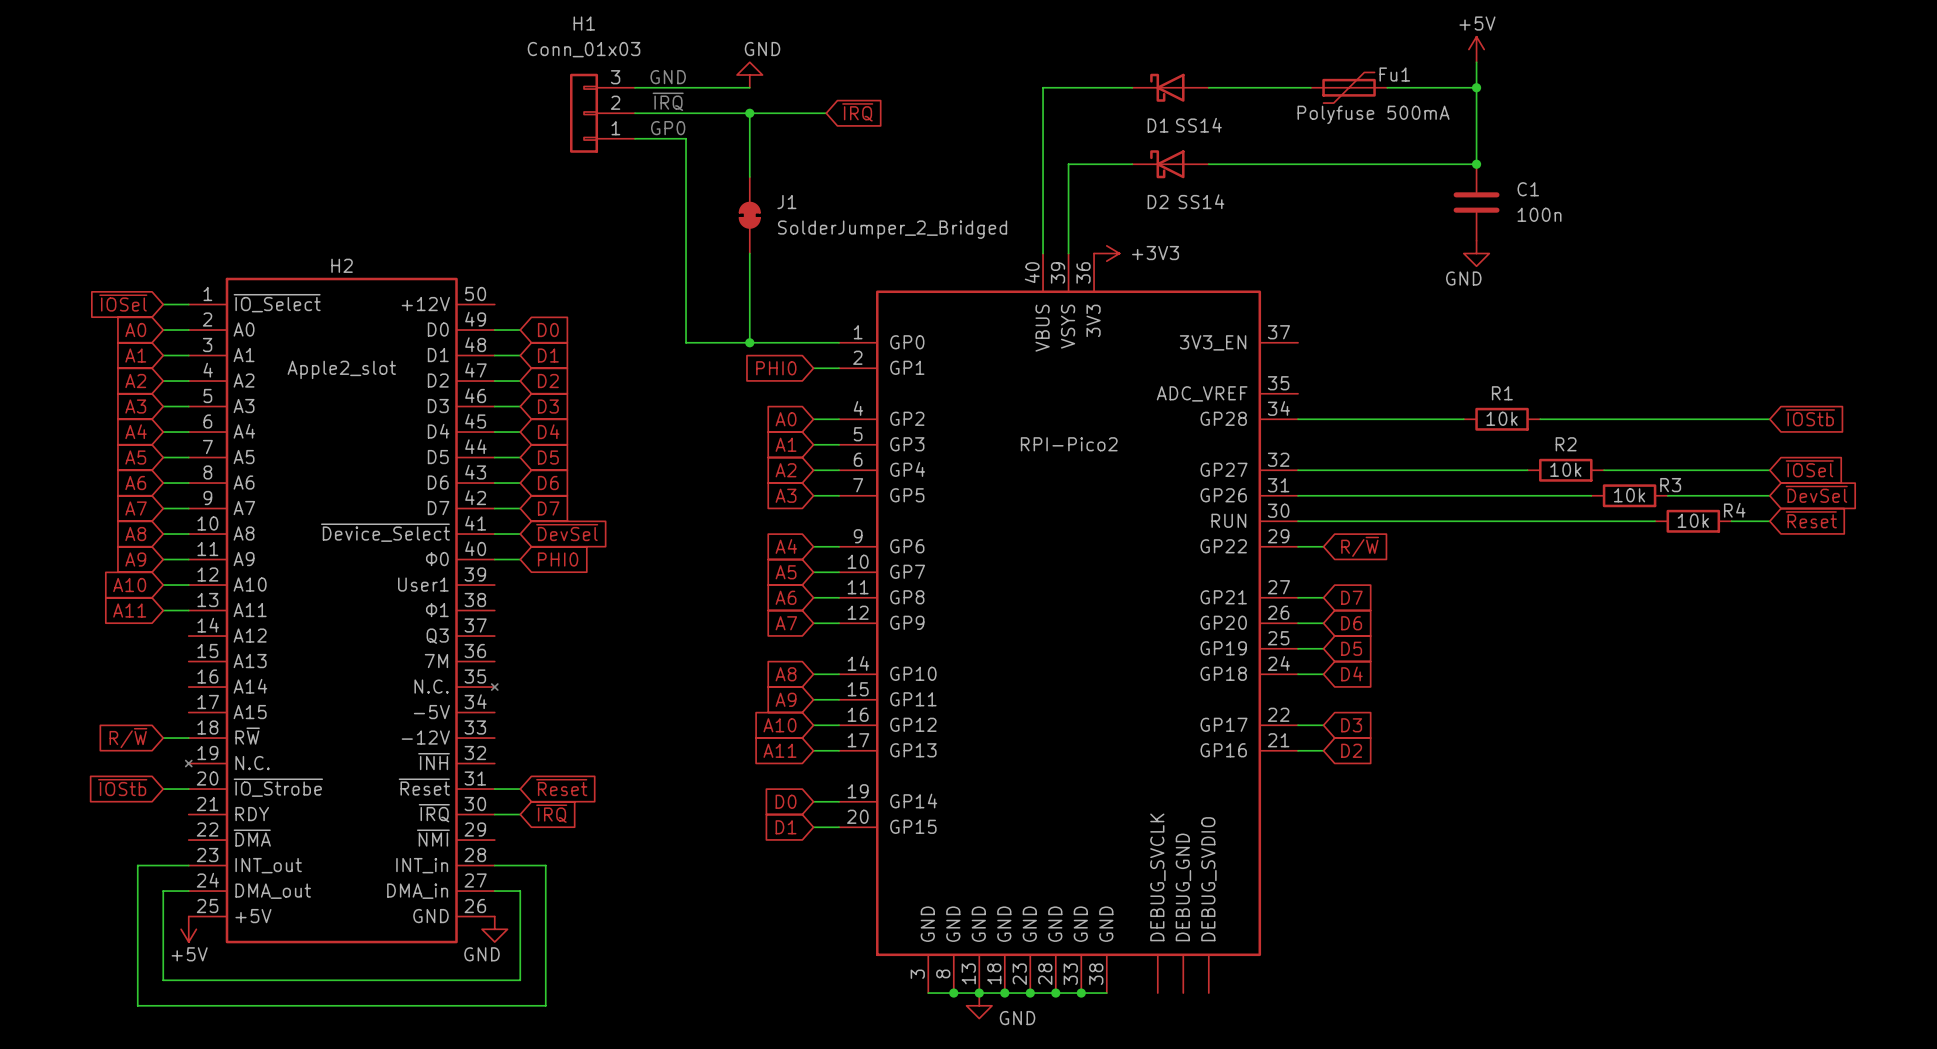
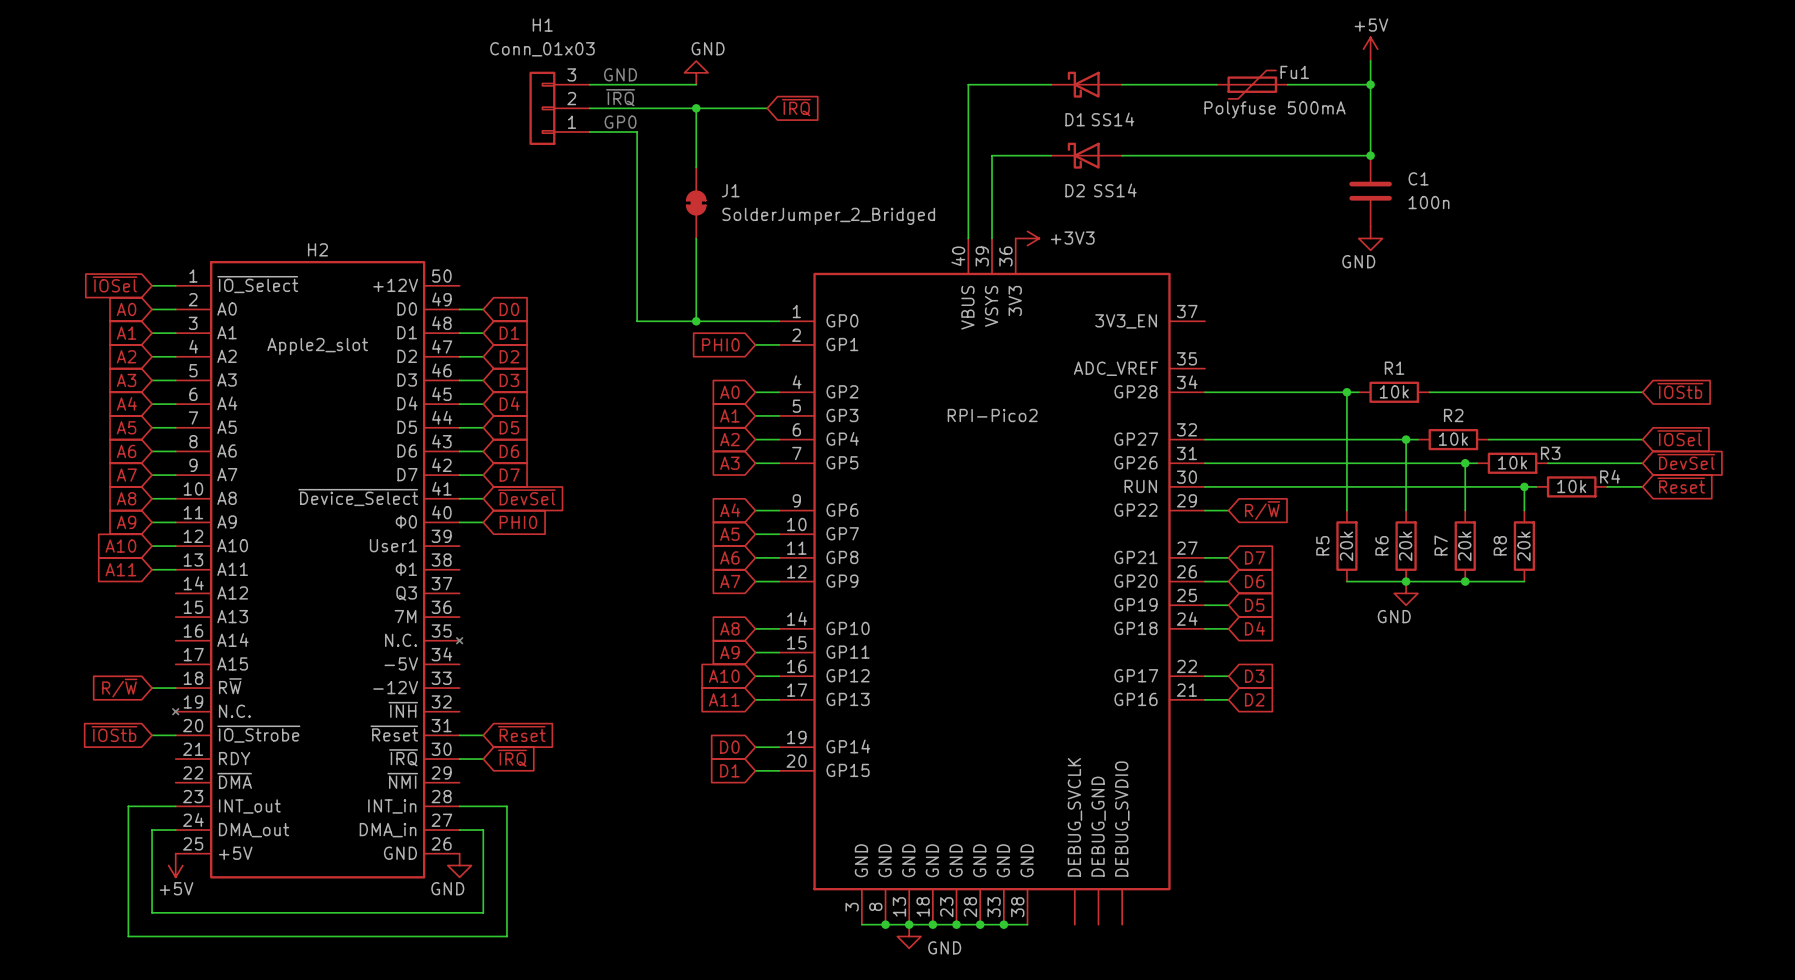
wire: none -> (1346, 392) (1346, 510)
junction: none -> (1346, 392)
wire: none -> (1406, 439) (1406, 510)
junction: none -> (1406, 439)
wire: none -> (1465, 463) (1465, 510)
junction: none -> (1465, 463)
wire: none -> (1524, 486) (1524, 510)
junction: none -> (1524, 486)
R5: none -> 20k (1346, 546)
R6: none -> 20k (1406, 546)
R7: none -> 20k (1465, 546)
R8: none -> 20k (1524, 546)
wire: none -> (1346, 581) (1524, 581)
junction: none -> (1406, 581)
junction: none -> (1465, 581)
power symbol: none -> GND (1406, 593)

